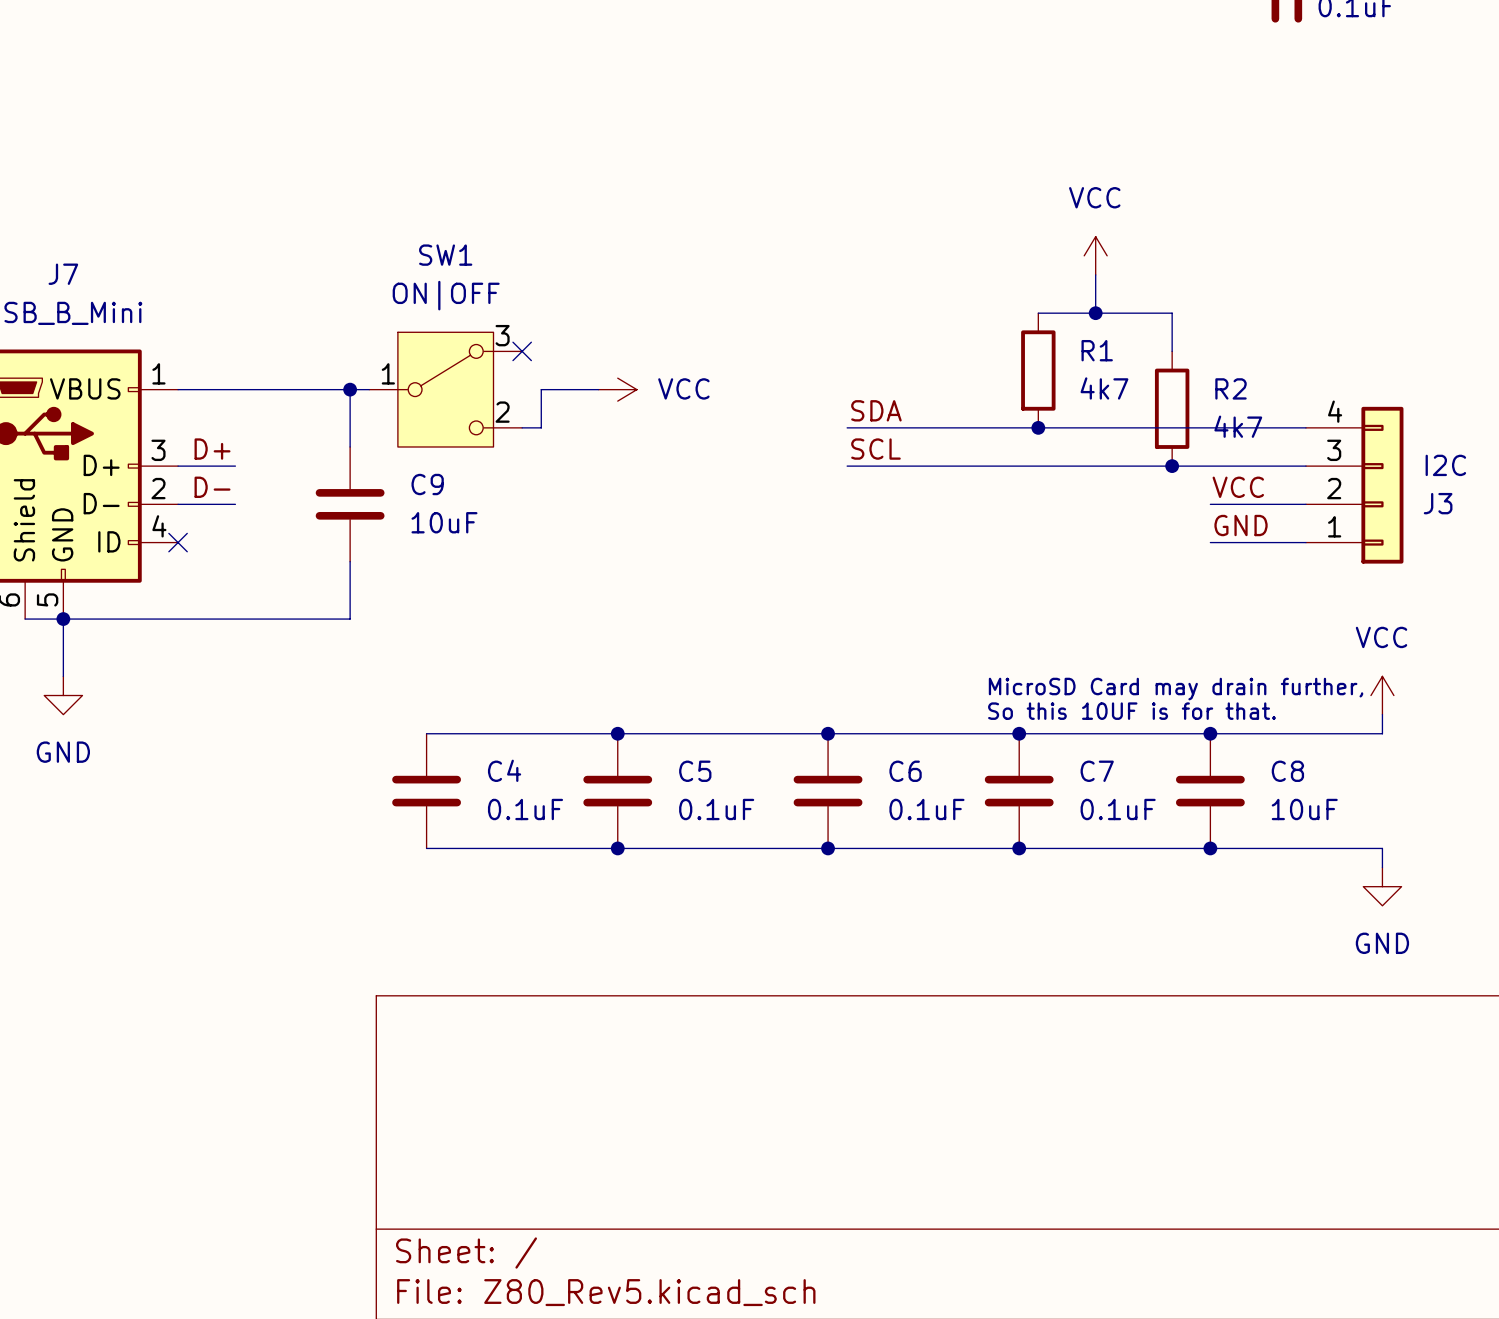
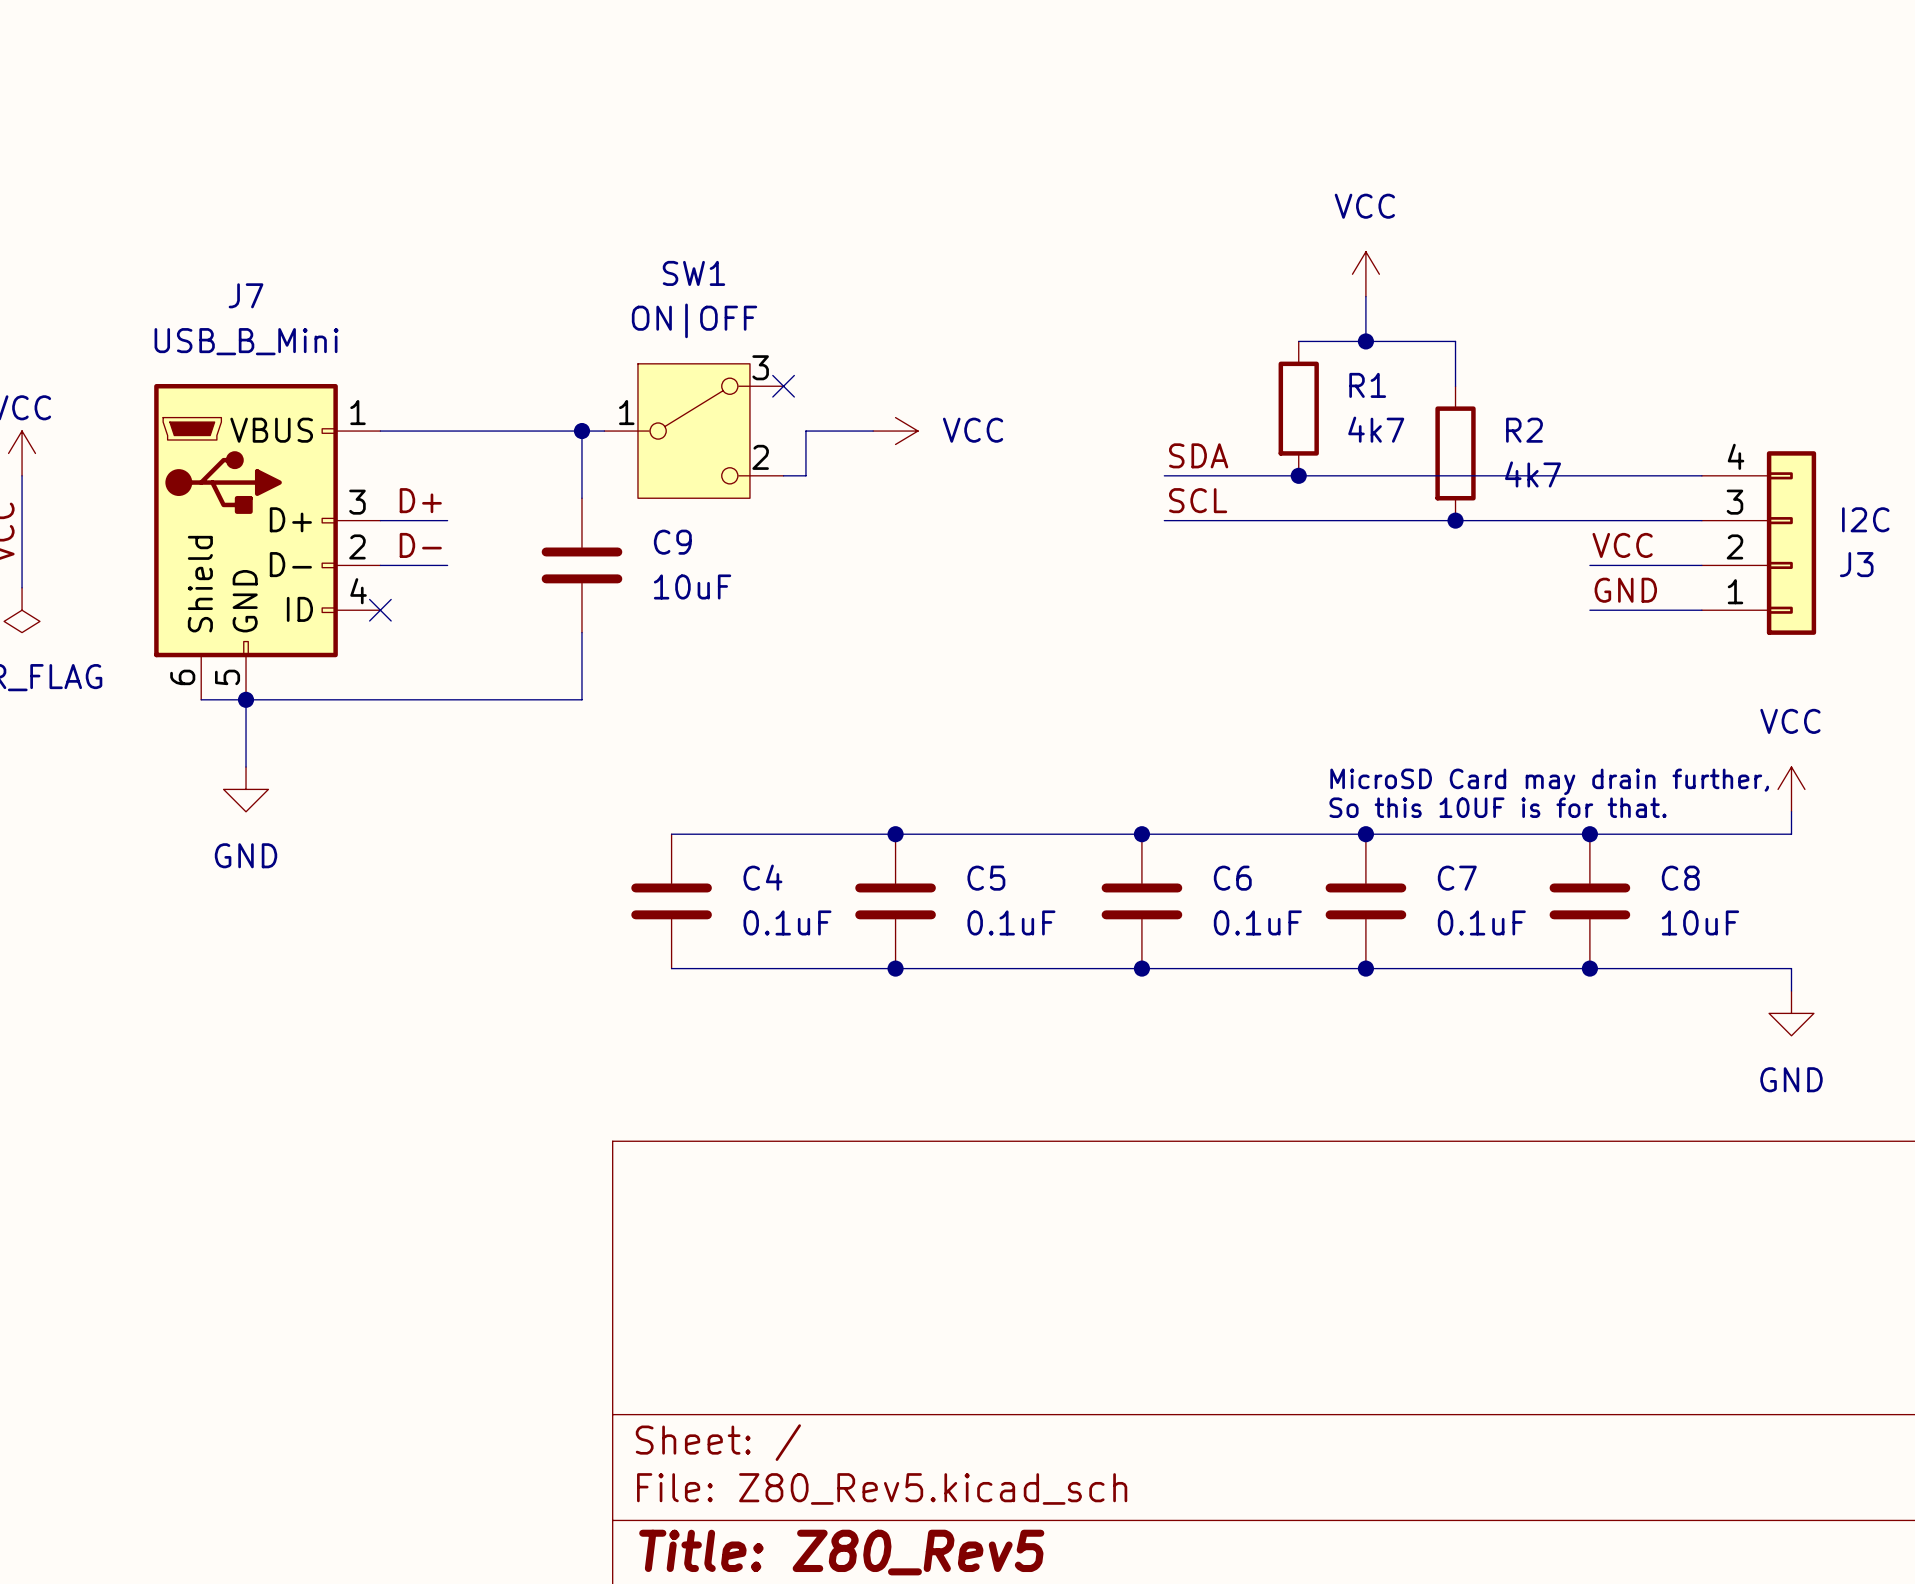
power symbol position: VCC (1095, 255) -> VCC (1365, 274)
wire: none -> (1365, 296) (1365, 341)
wire: (1095, 274) (1095, 313) (1172, 313) (1172, 351) -> none
wire: none -> (1298, 341) (1388, 341)
junction: none -> (1365, 341)
wire: none -> (1455, 341) (1455, 386)
junction: (1095, 313) -> none
R1 position: (1038, 370) -> (1298, 408)
R2 position: (1172, 408) -> (1455, 453)
junction: none -> (1298, 475)
junction: (1038, 427) -> none
junction: none -> (1455, 520)
junction: (1172, 466) -> none

